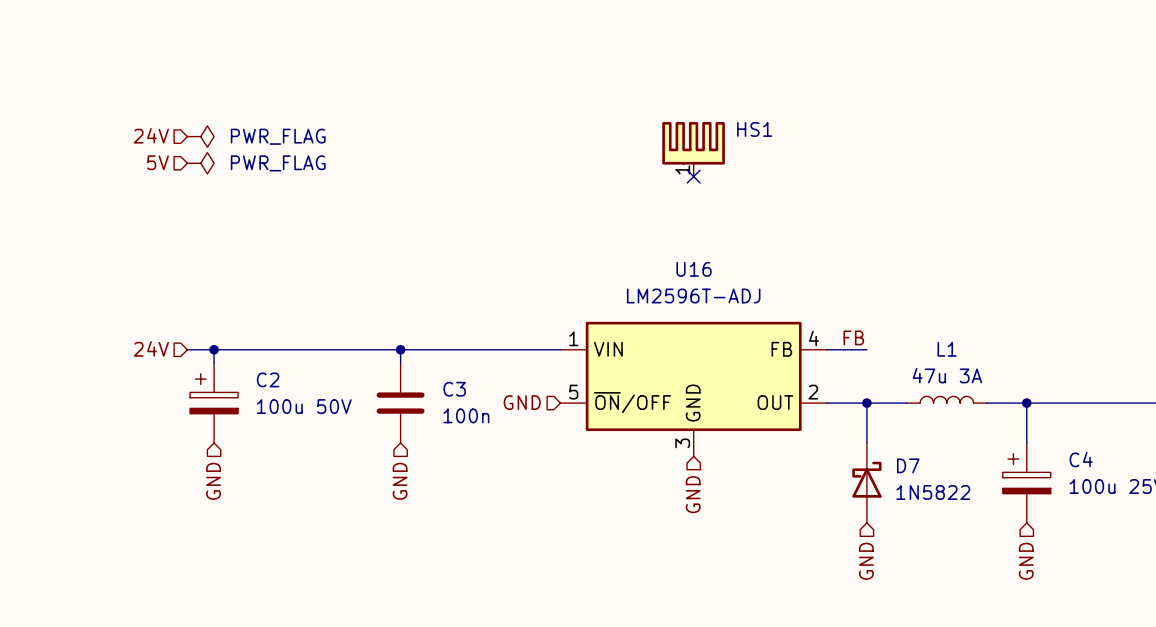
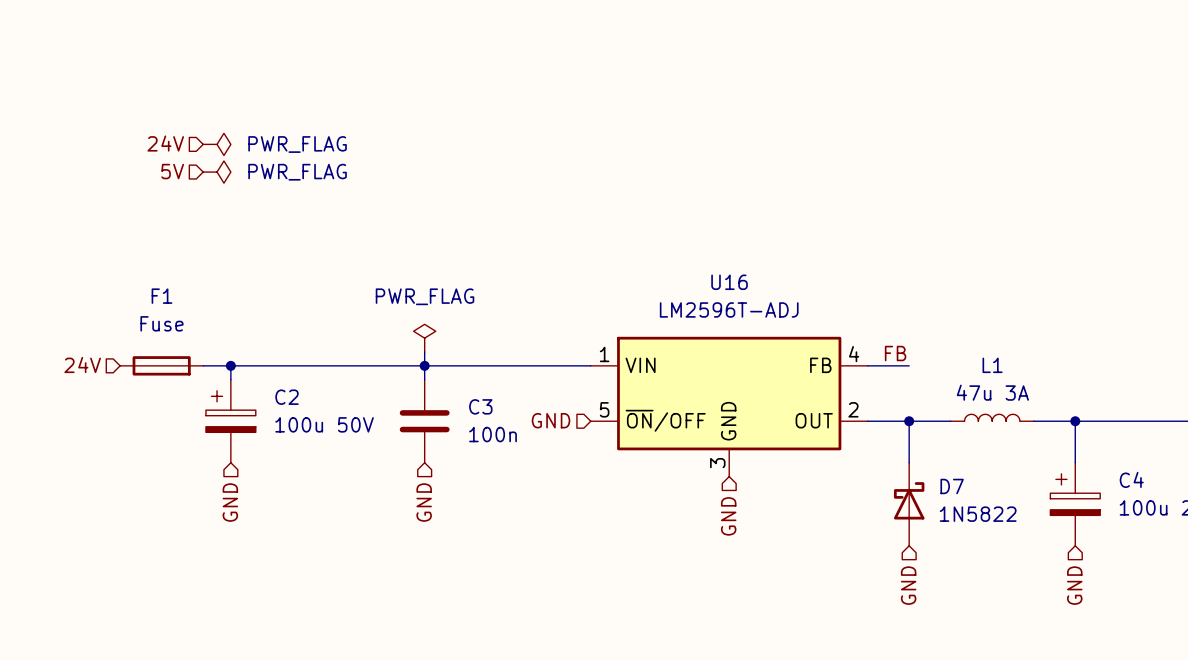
HS1: (693, 149) -> none
no-connect mark: (693, 176) -> none
power symbol: none -> PWR_FLAG (424, 338)
wire: none -> (424, 352) (424, 365)
hierarchical label position: 24V (151, 348) -> 24V (82, 365)
F1: none -> Fuse (161, 365)

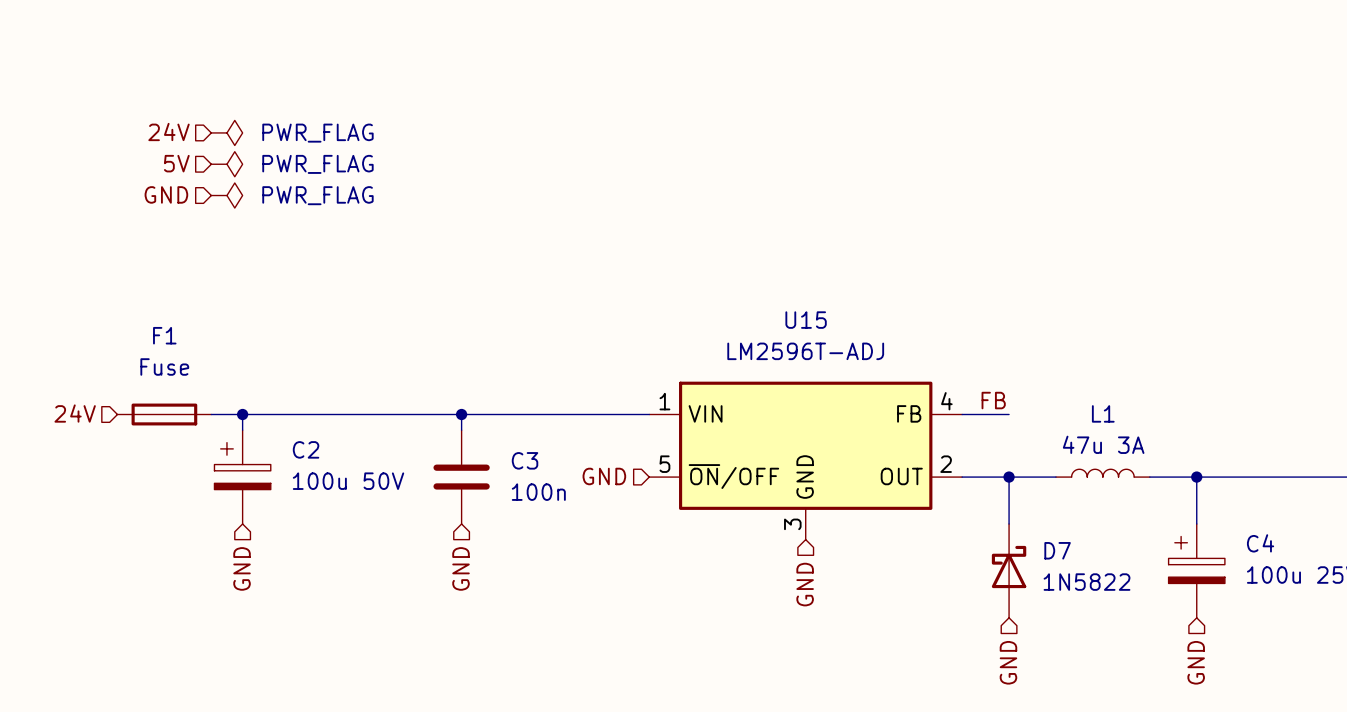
hierarchical label: none -> 24V (169, 131)
power symbol: none -> PWR_FLAG (226, 132)
hierarchical label: 24V (165, 143) -> 5V (176, 163)
hierarchical label: 5V (172, 171) -> GND (166, 194)
U16 name: U16 (729, 282) -> U15 (806, 320)
power symbol: PWR_FLAG (424, 338) -> none
wire: (424, 352) (424, 365) -> none

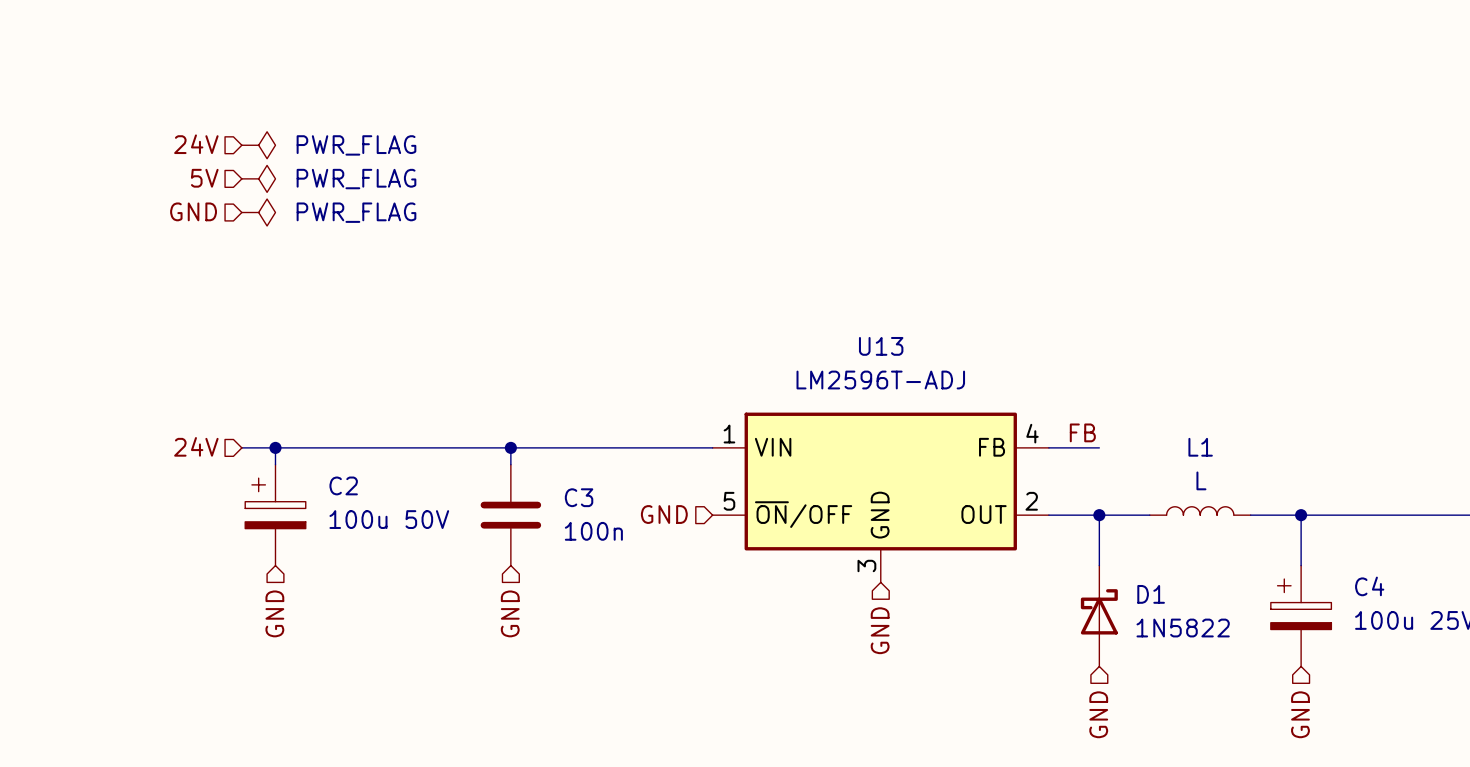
U15 name: U15 (806, 320) -> U13 (881, 346)
hierarchical label position: 24V (75, 413) -> 24V (196, 446)
F1: Fuse (164, 414) -> none
L1 value: 47u 3A (1103, 444) -> L (1201, 480)
D7 name: D7 (1057, 550) -> D1 (1151, 594)

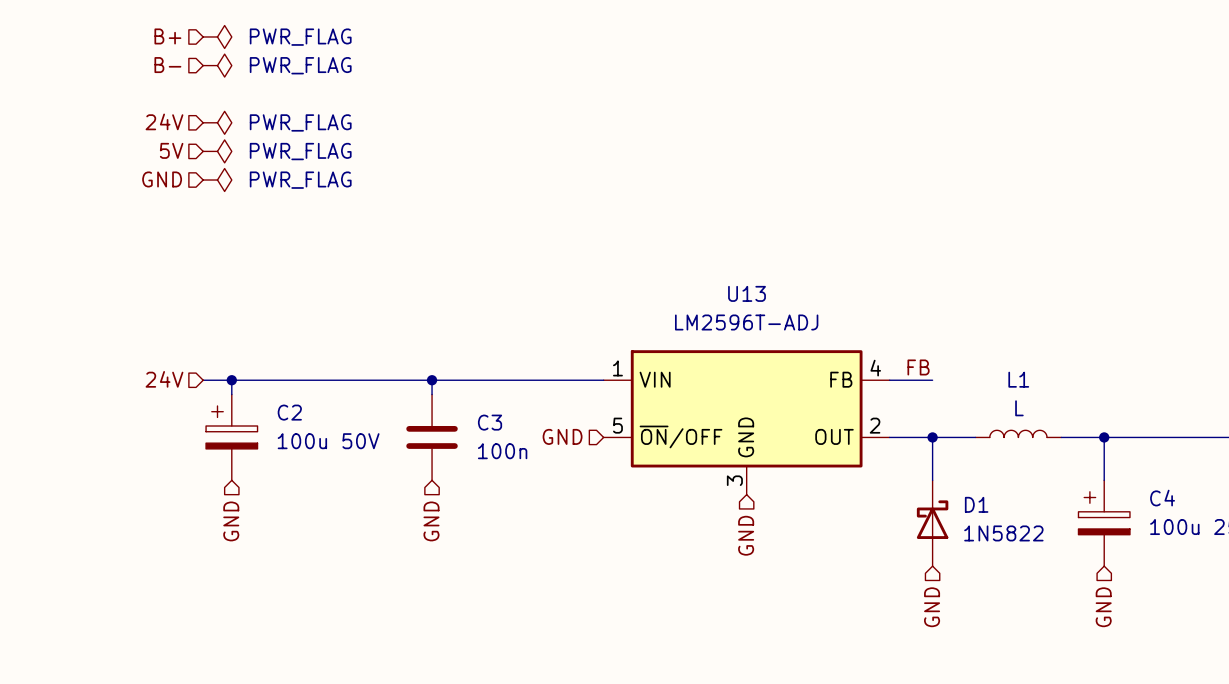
hierarchical label: none -> B+ (167, 36)
power symbol: none -> PWR_FLAG (217, 36)
hierarchical label: none -> B- (167, 65)
power symbol: none -> PWR_FLAG (217, 65)

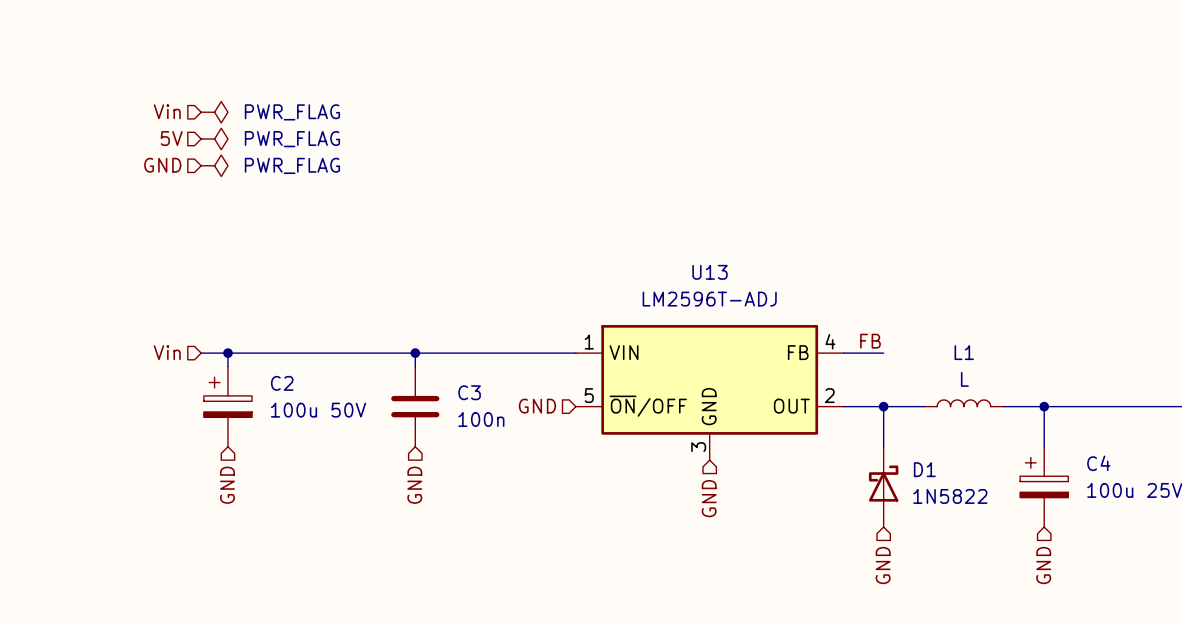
hierarchical label: B+ (167, 36) -> none
power symbol: PWR_FLAG (217, 36) -> none
hierarchical label: B- (167, 65) -> none
power symbol: PWR_FLAG (217, 65) -> none
hierarchical label: 24V (164, 121) -> Vin (167, 111)
hierarchical label: 24V (164, 379) -> Vin (167, 352)

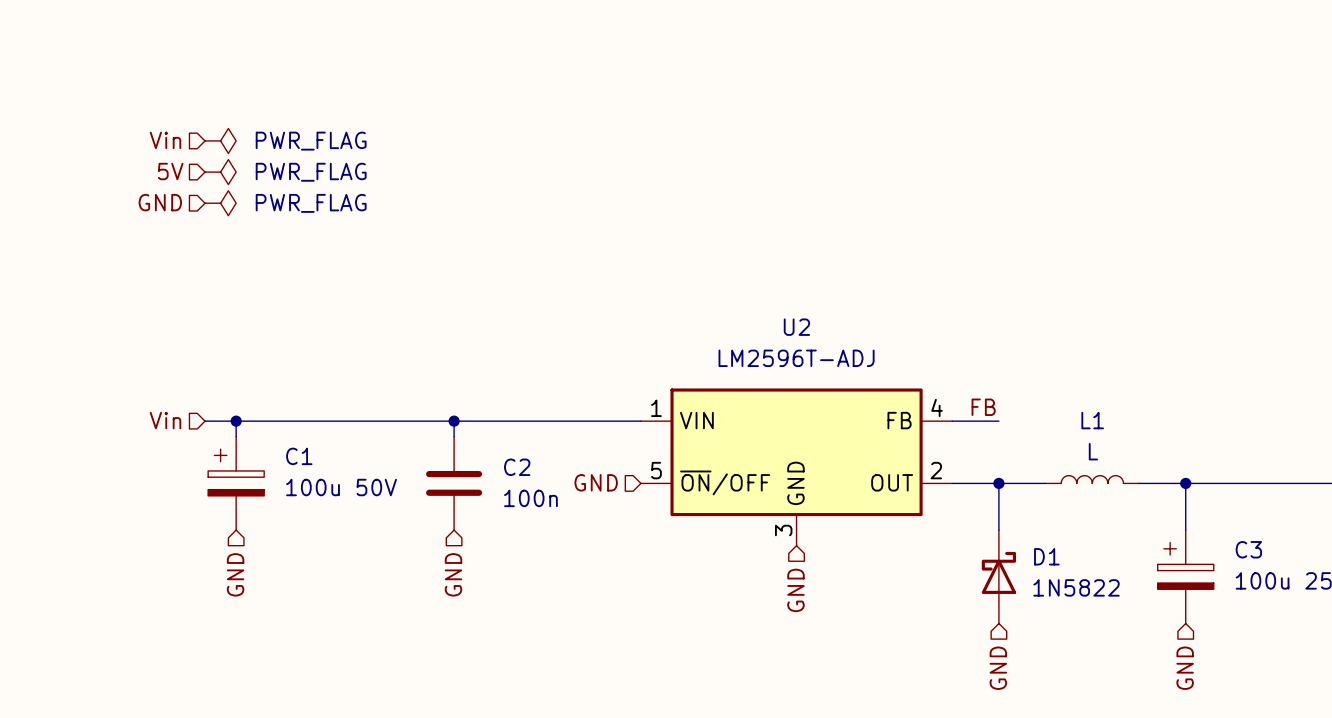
U13 name: U13 (710, 272) -> U2 (796, 327)
C2 name: C2 (282, 383) -> C1 (299, 456)
C3 name: C3 (469, 392) -> C2 (517, 467)
C4 name: C4 (1098, 463) -> C3 (1248, 549)

